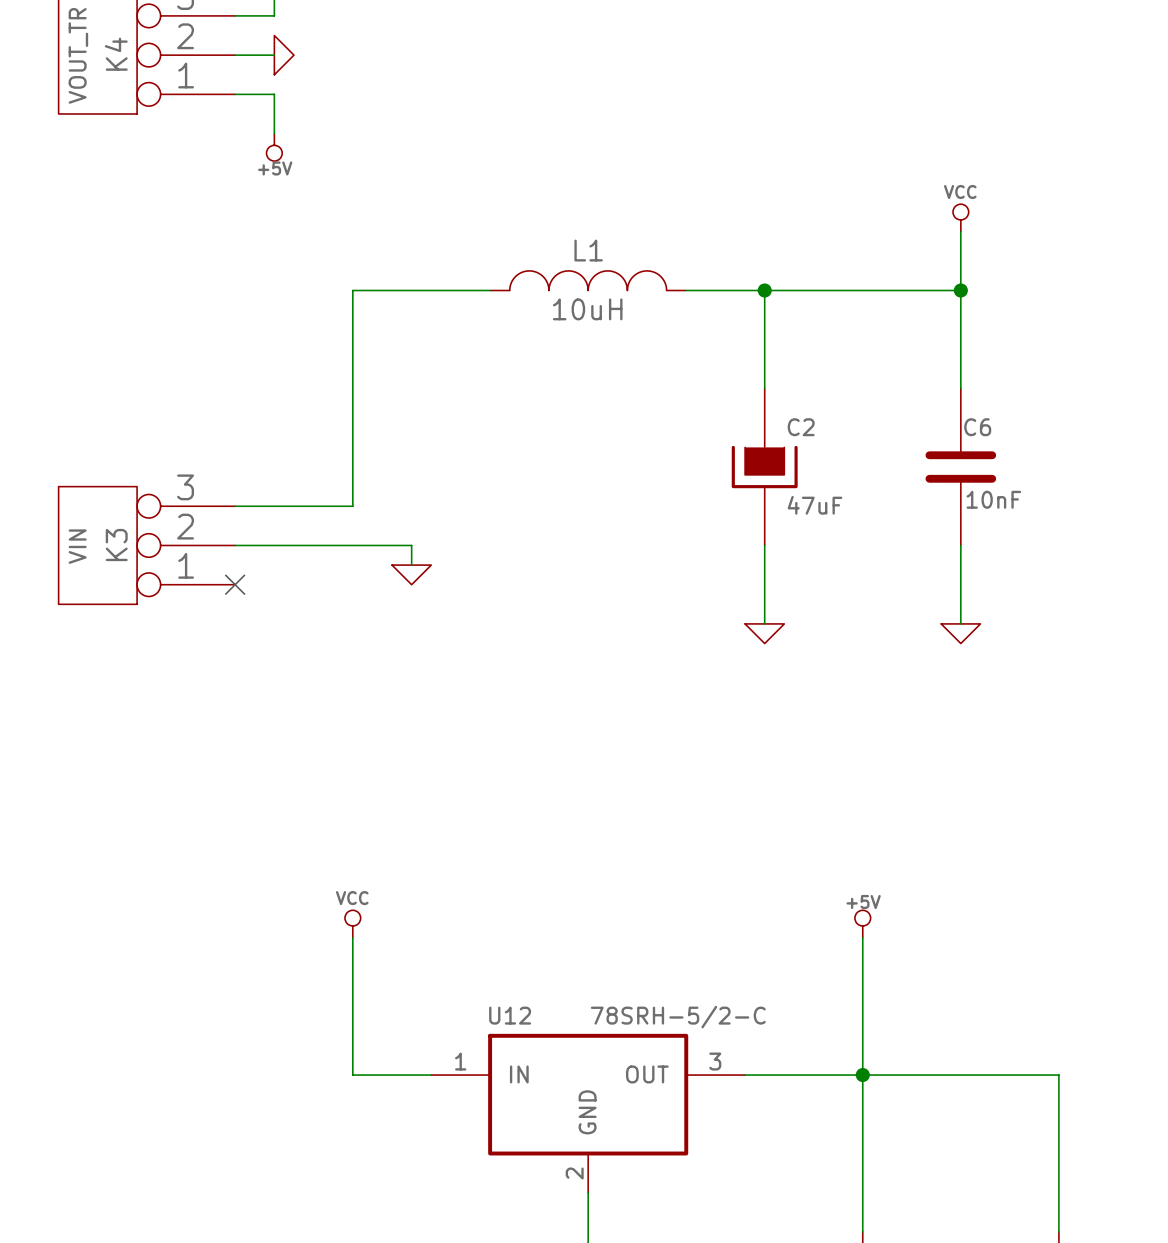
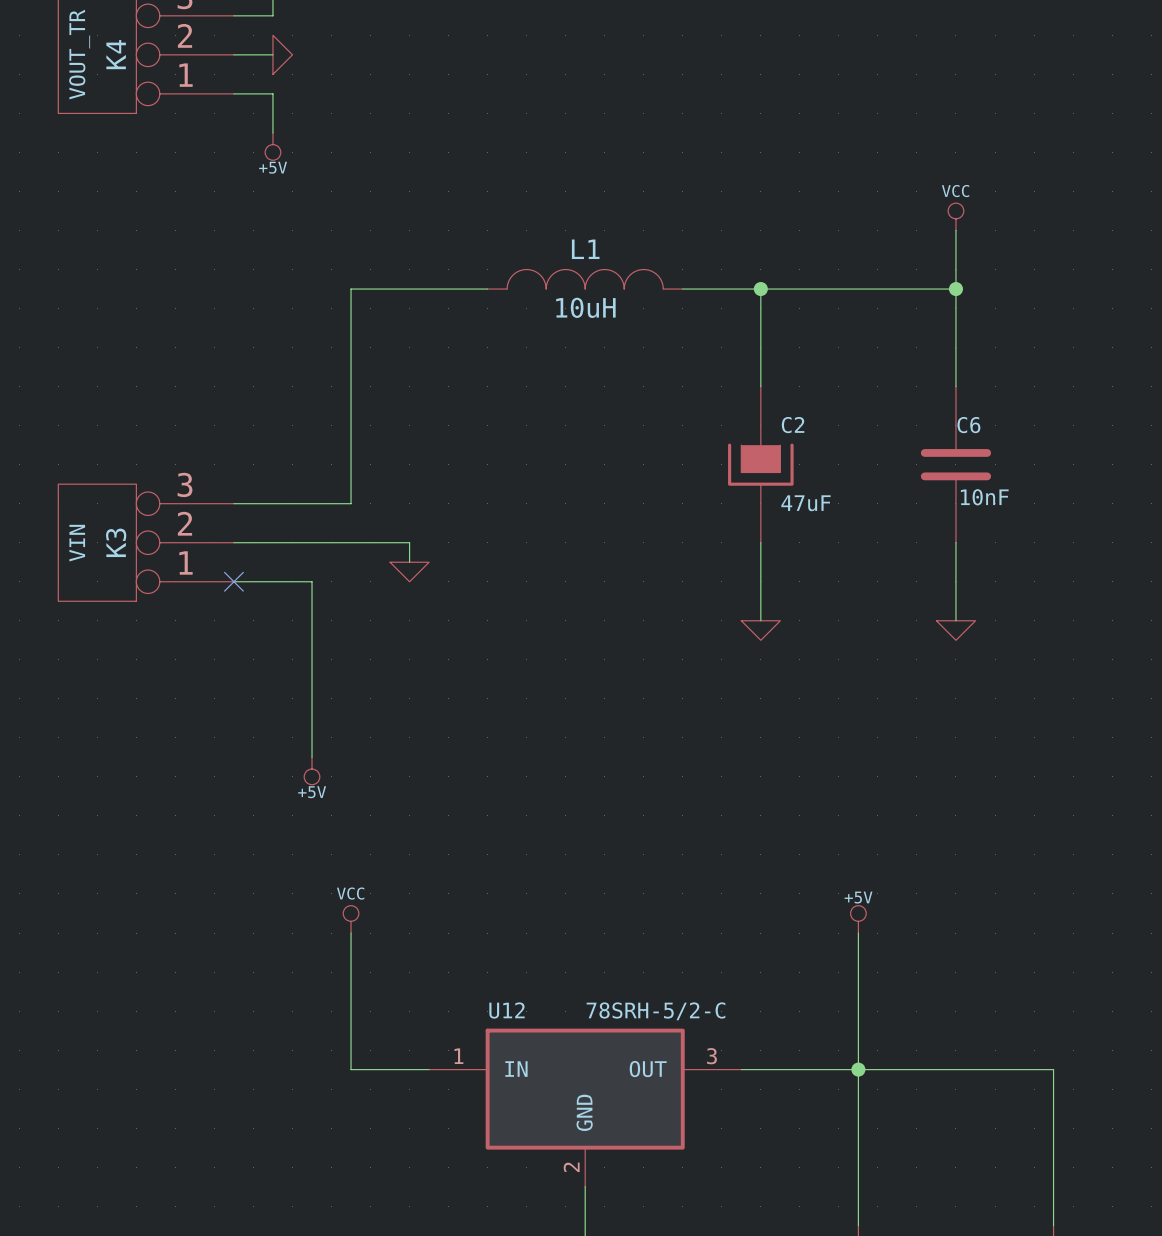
wire: none -> (233, 581) (312, 581) (312, 757)
power symbol: none -> +5V (312, 771)

